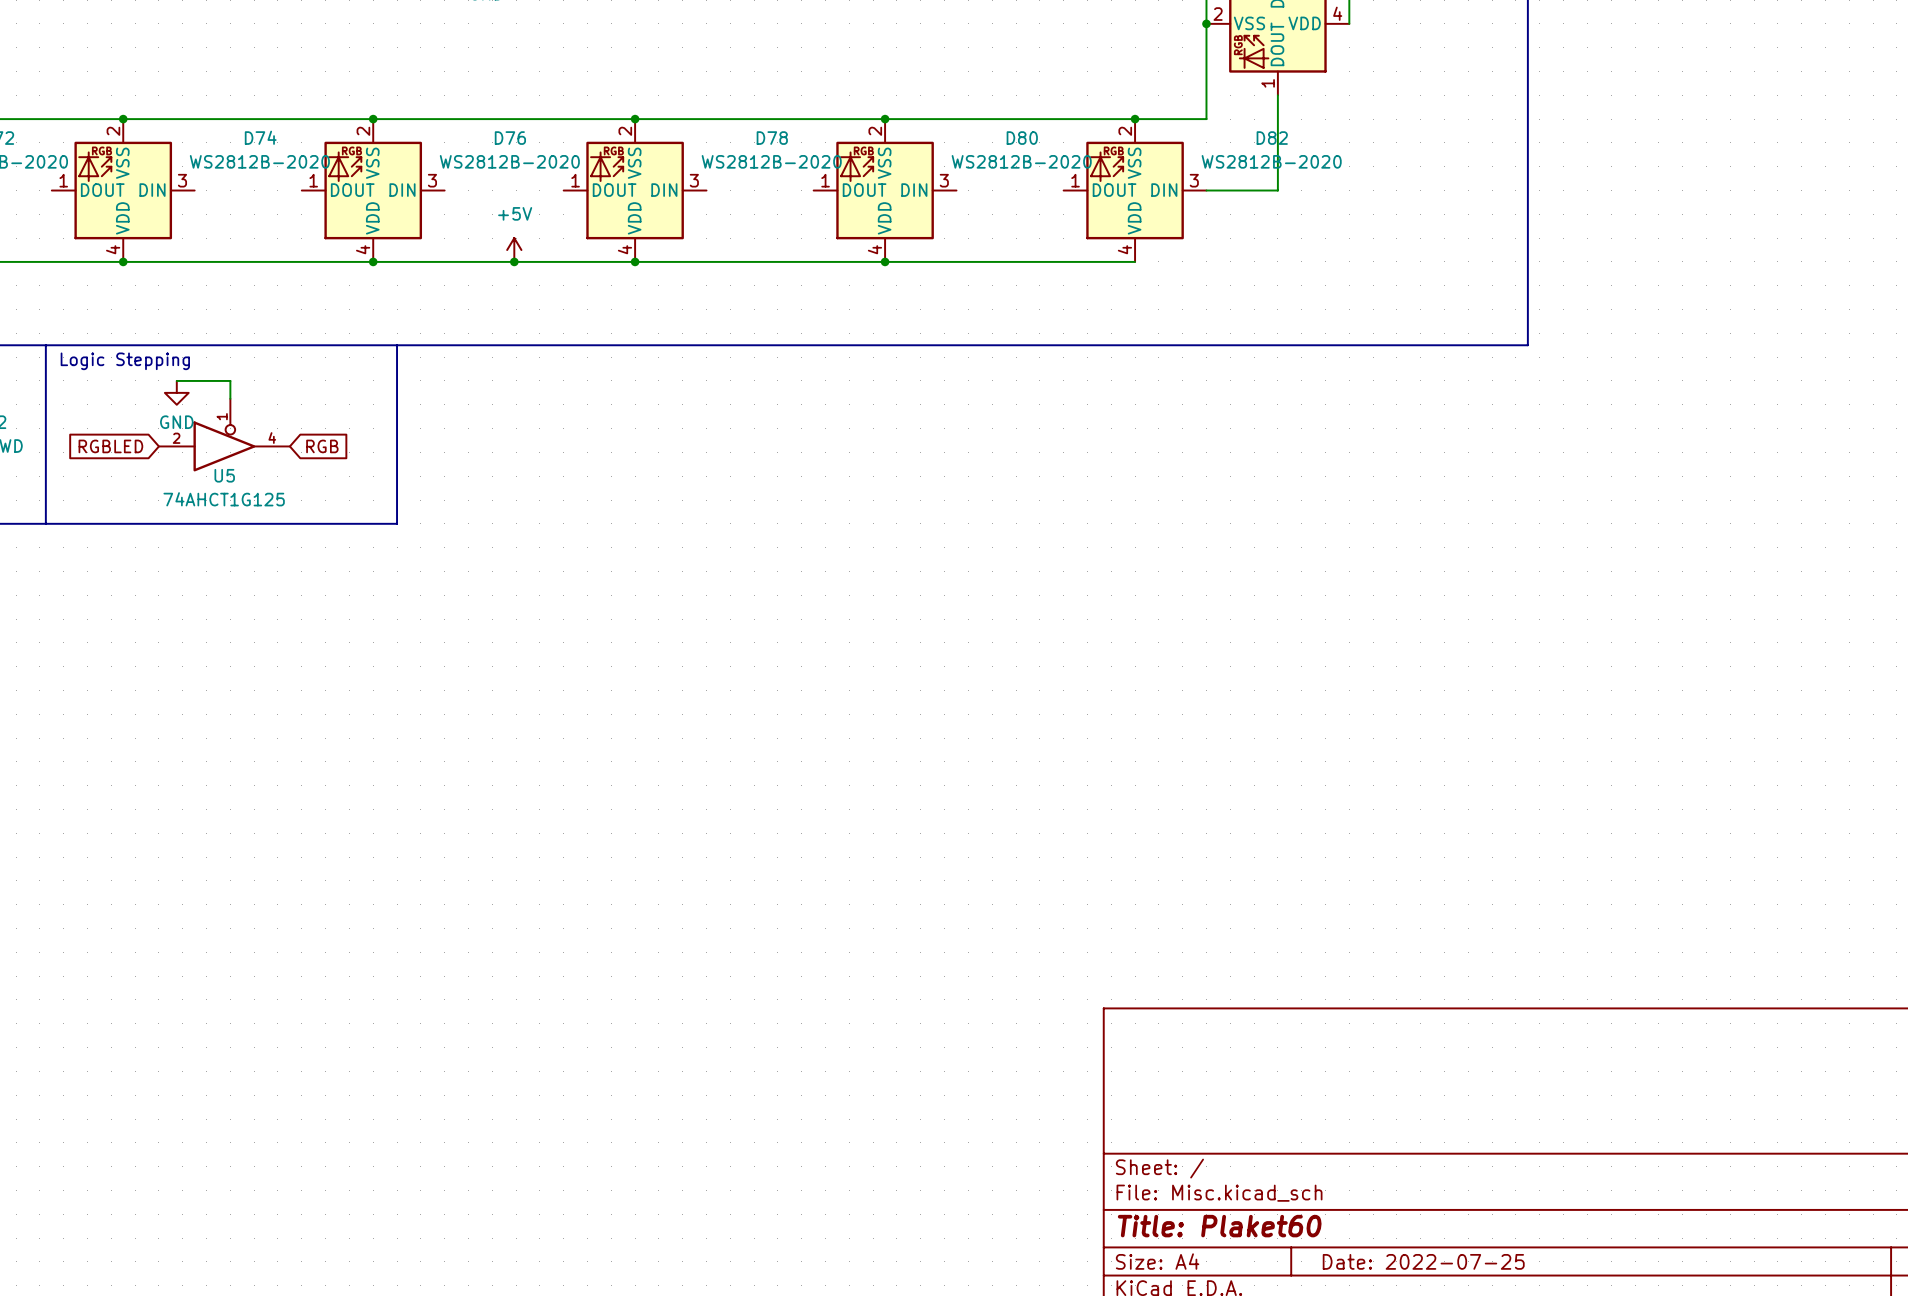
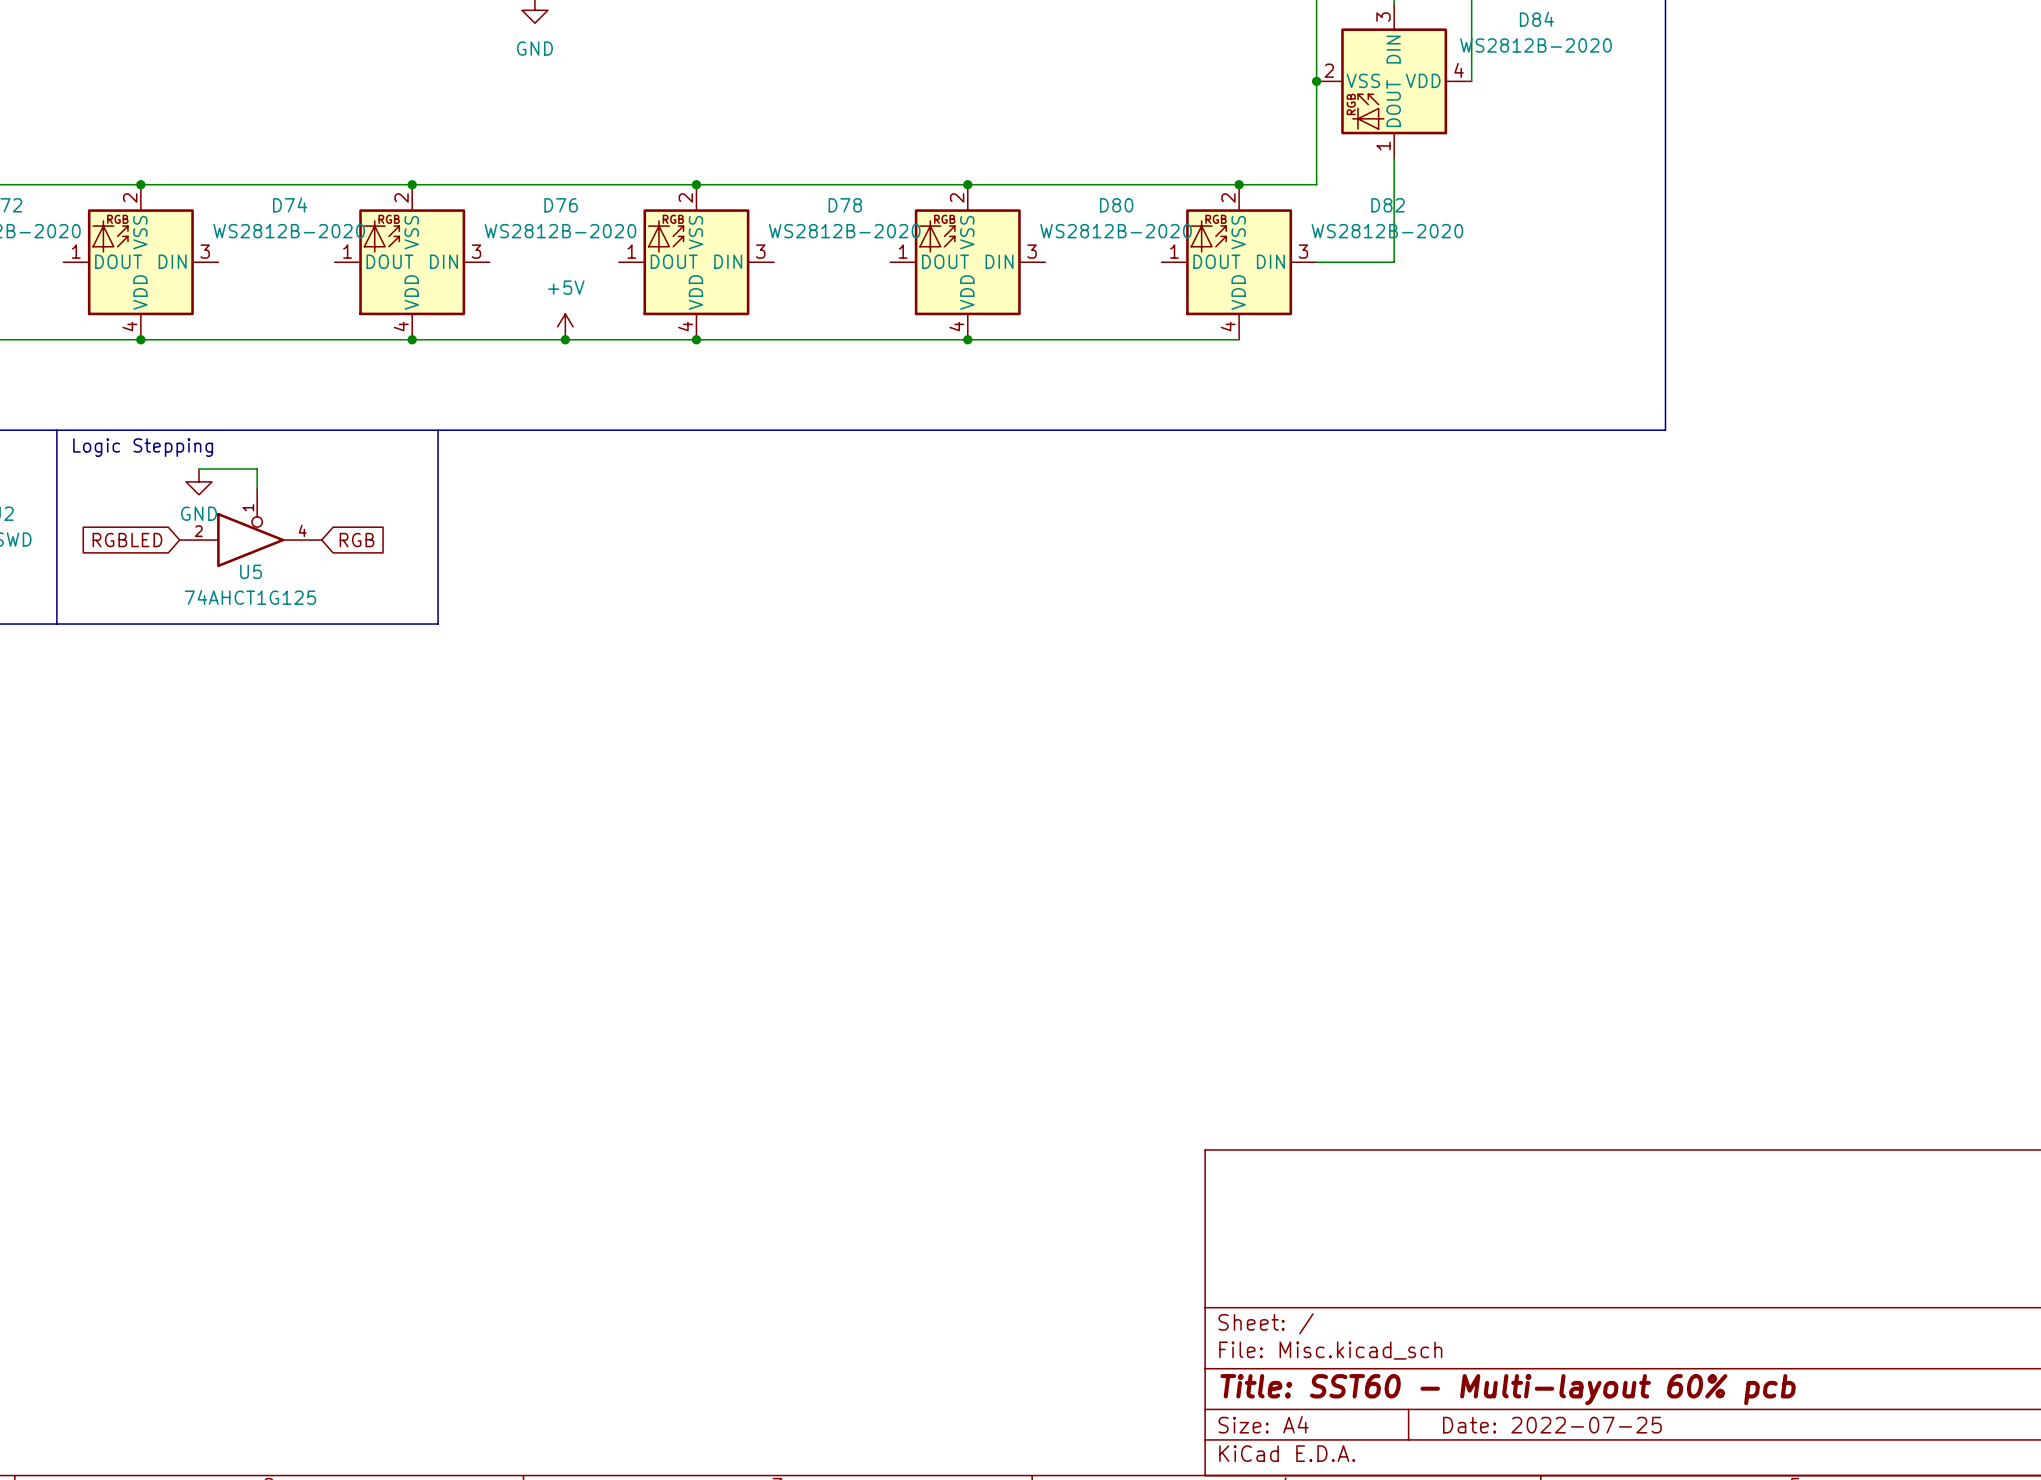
title block: Title: Plaket60 (1219, 1226) -> Title: SST60 - Multi-layout 60% pcb (1508, 1389)

